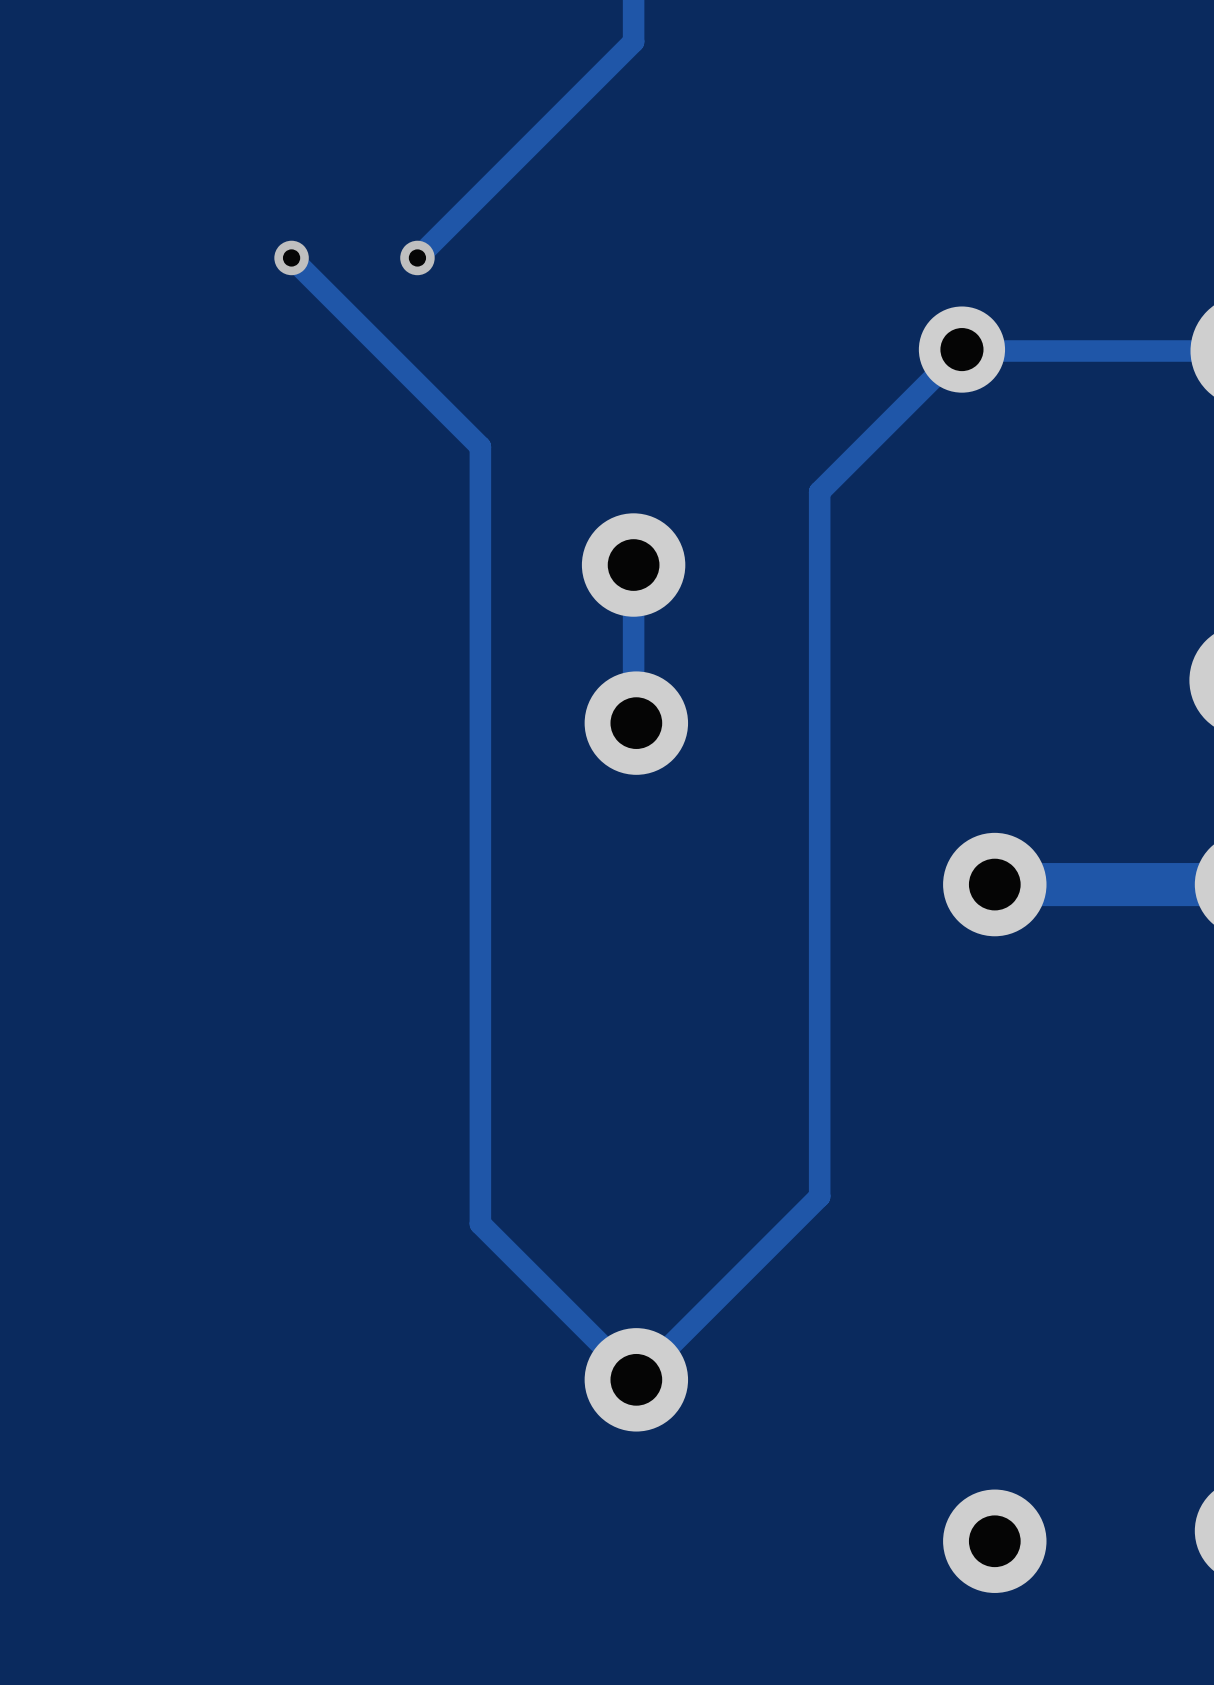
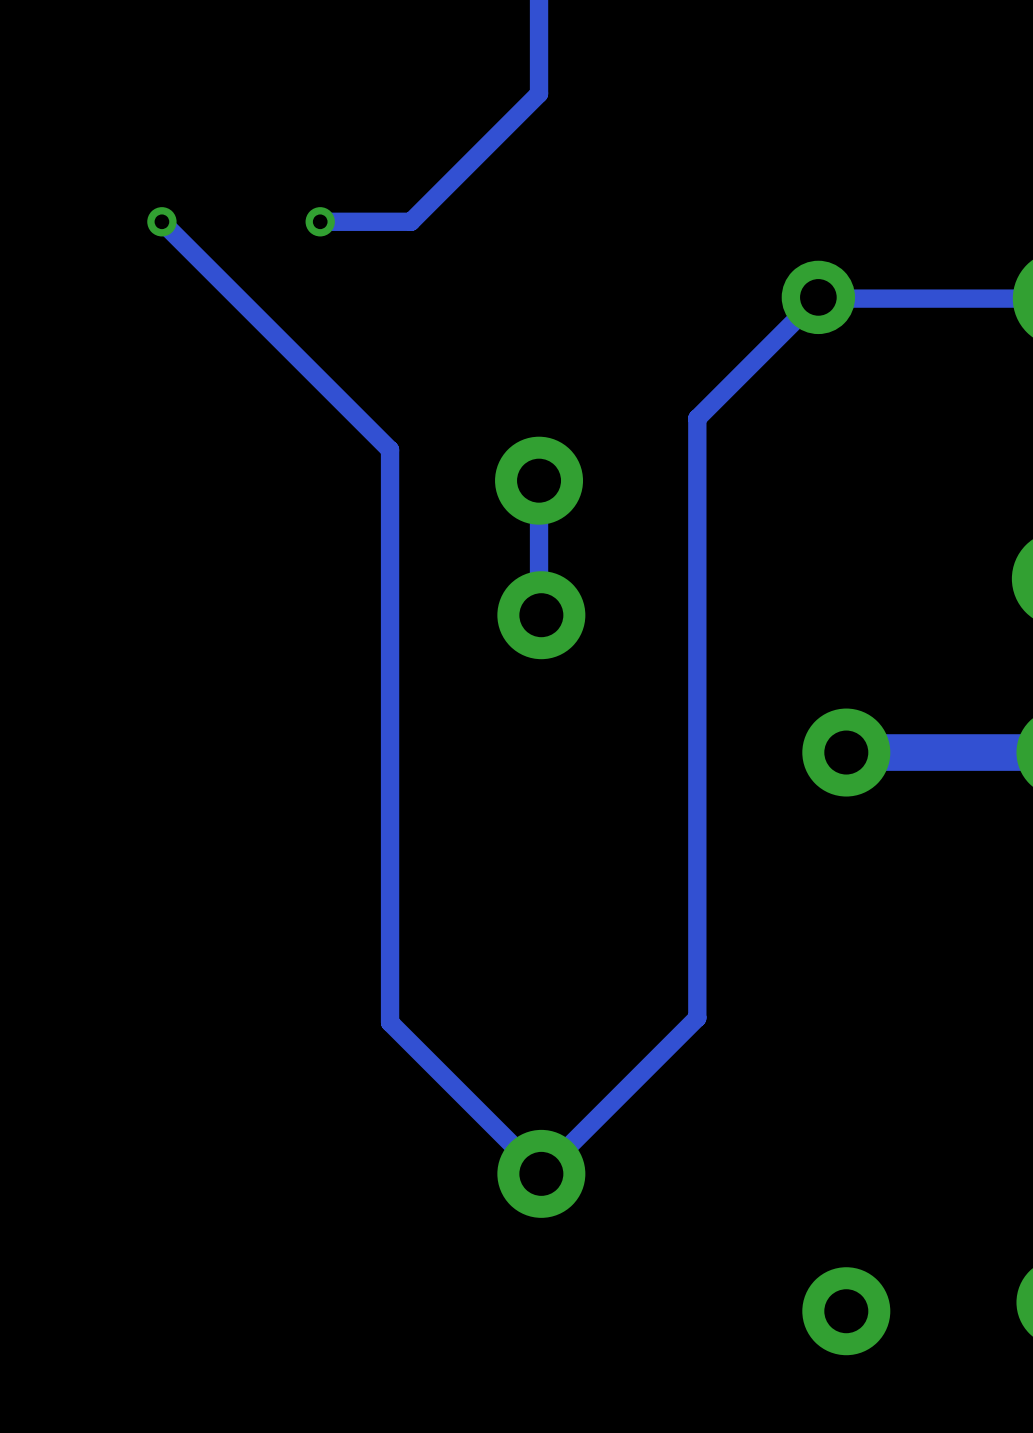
track: (633, 41) (417, 257) -> (539, 35) (539, 93) (411, 221) (320, 221)
track: (291, 257) (480, 446) (480, 1223) -> (161, 221) (390, 449) (390, 1022) (408, 1041)
via: (291, 257) -> none
via position: (417, 257) -> (320, 221)
via: none -> (161, 221)

